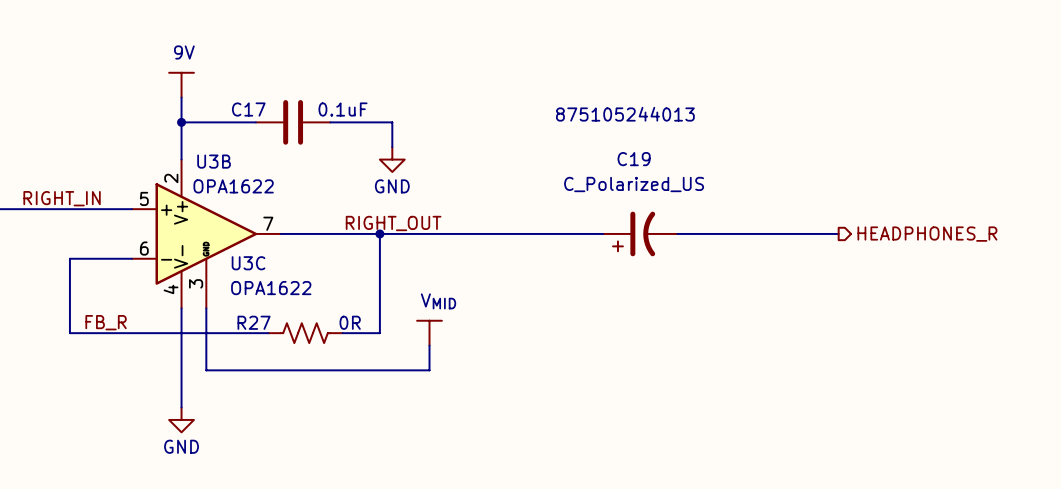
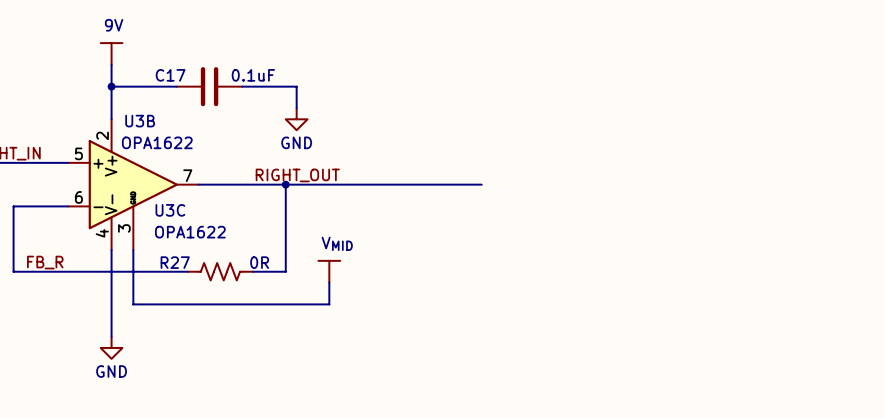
text: 875105244013 (625, 114) -> none
C19: C_Polarized_US (640, 233) -> none
wire: (677, 233) (838, 233) -> none
hierarchical label: HEADPHONES_R (927, 234) -> none

